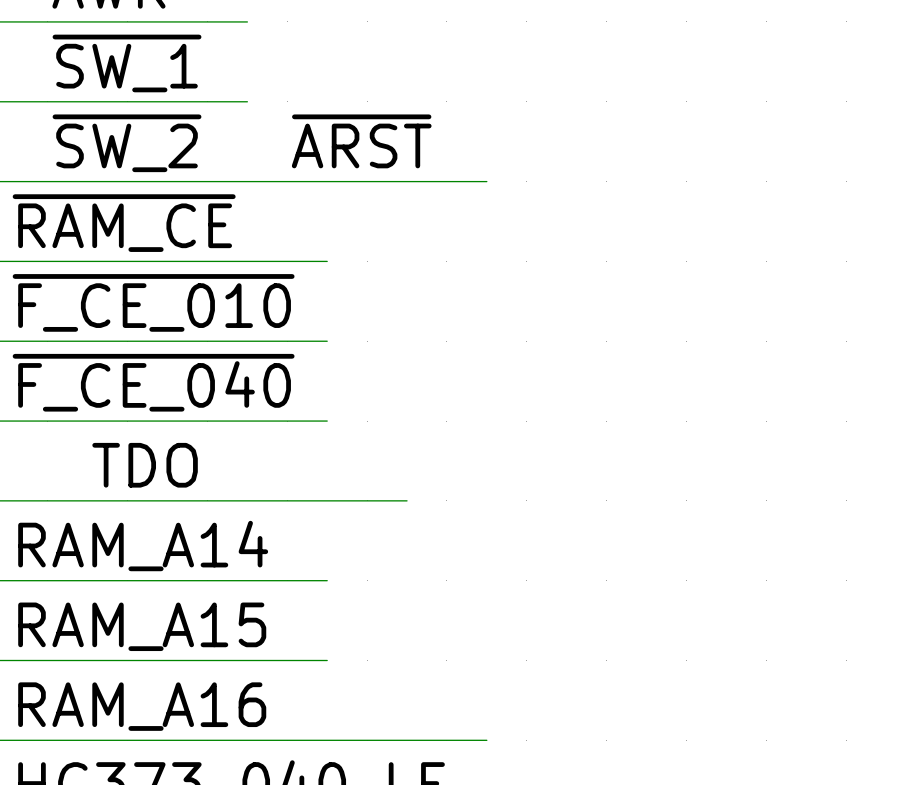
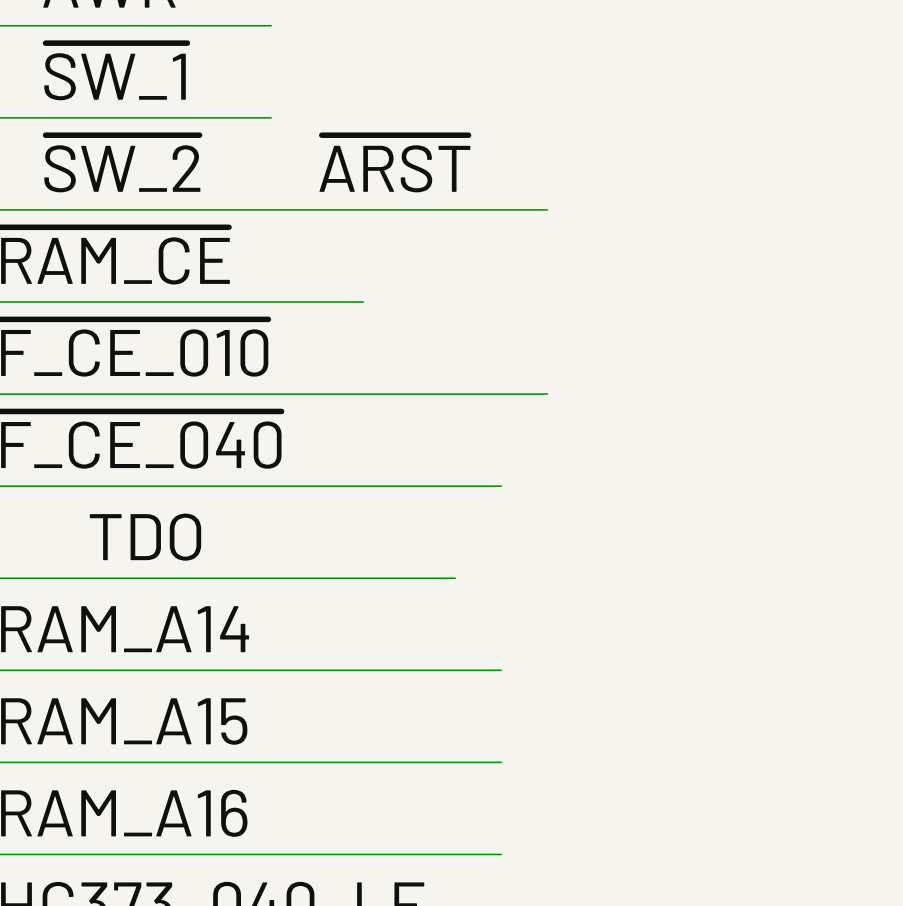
wire: none -> (363, 394) (547, 394)
wire: none -> (363, 486) (501, 486)
wire: none -> (363, 670) (501, 670)
wire: none -> (363, 762) (501, 762)
wire: (446, 740) (486, 740) -> none

